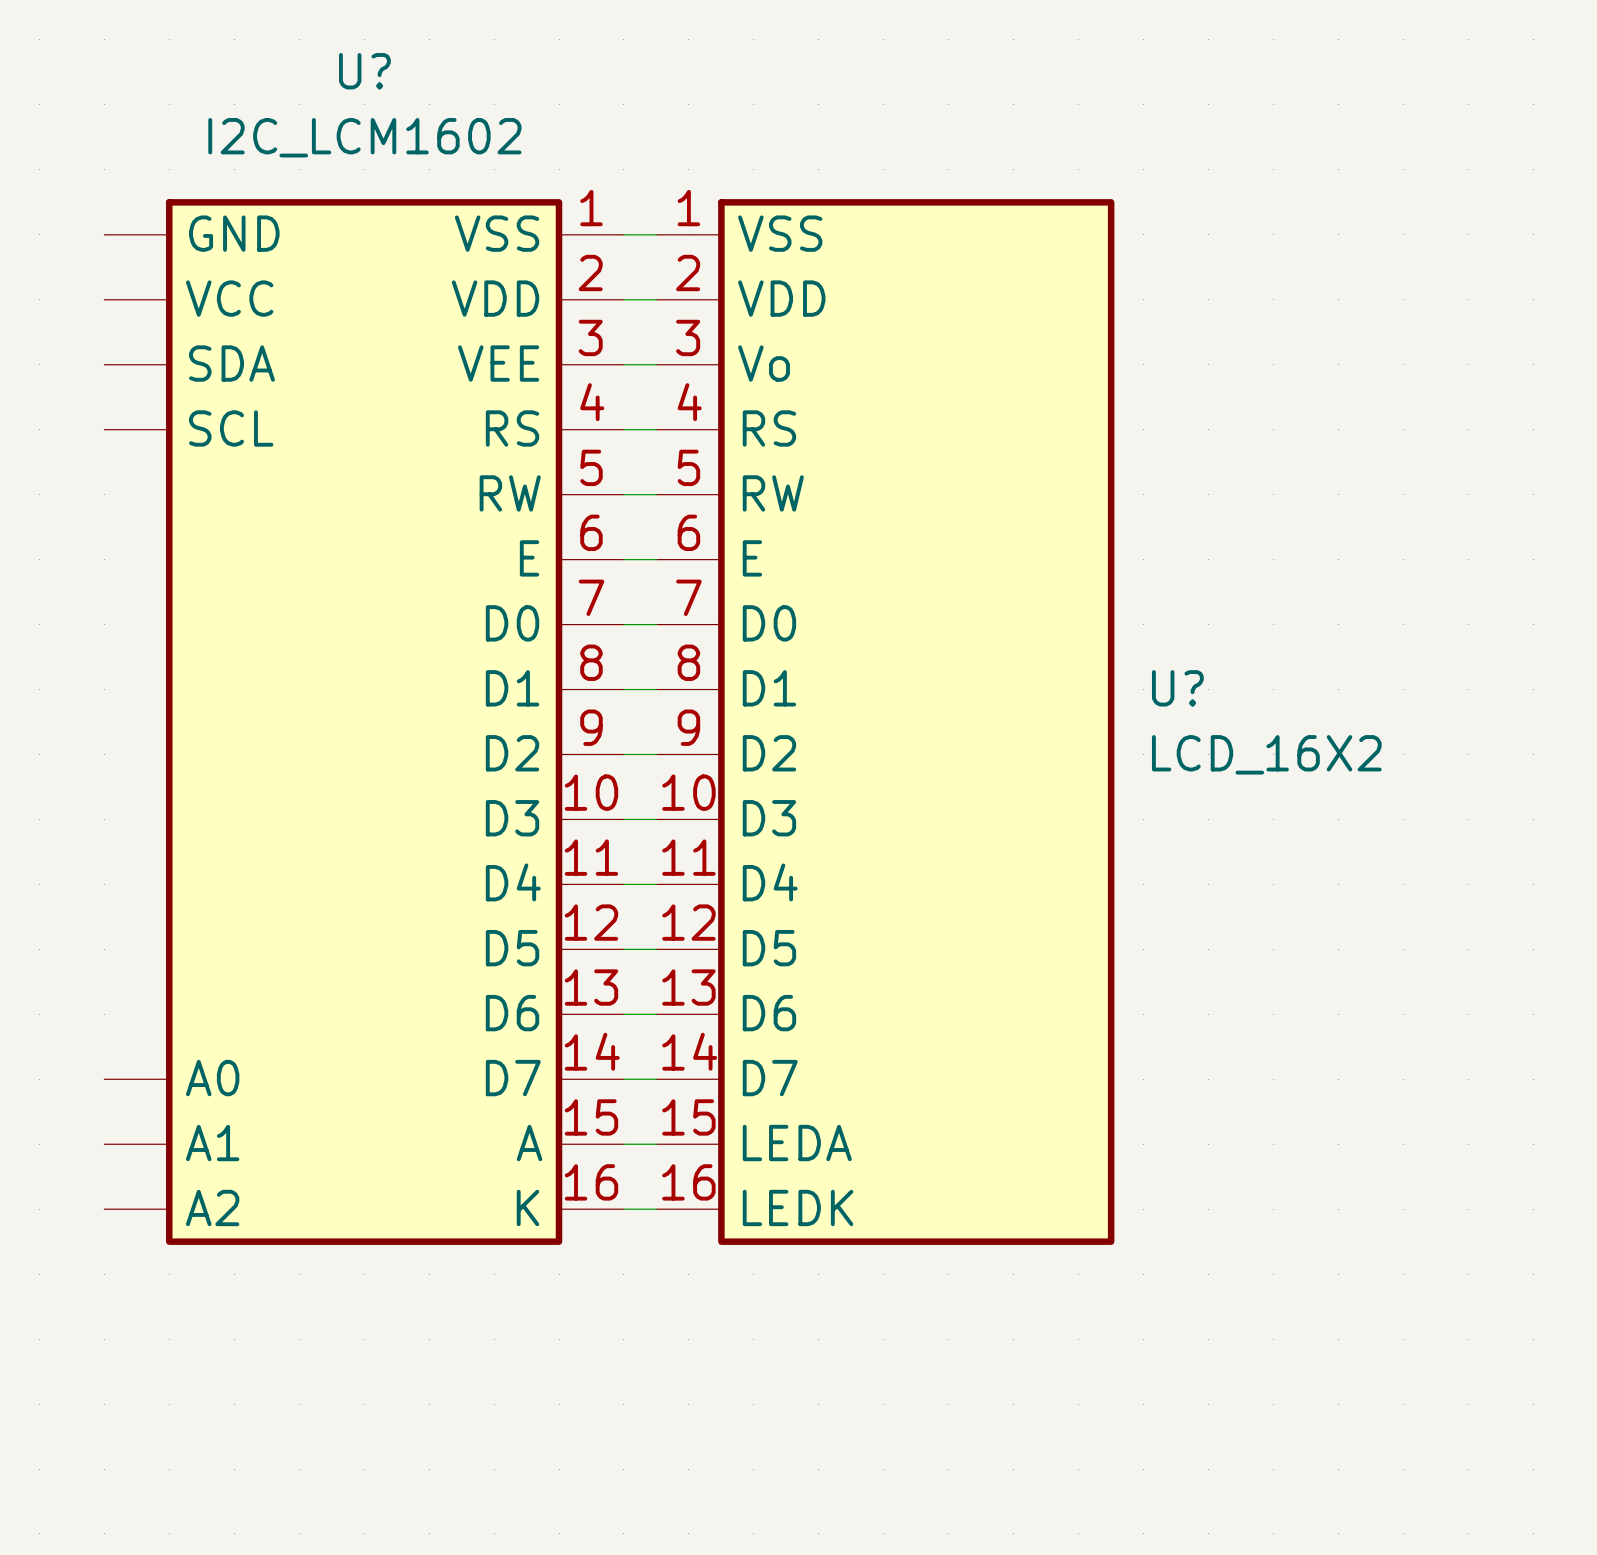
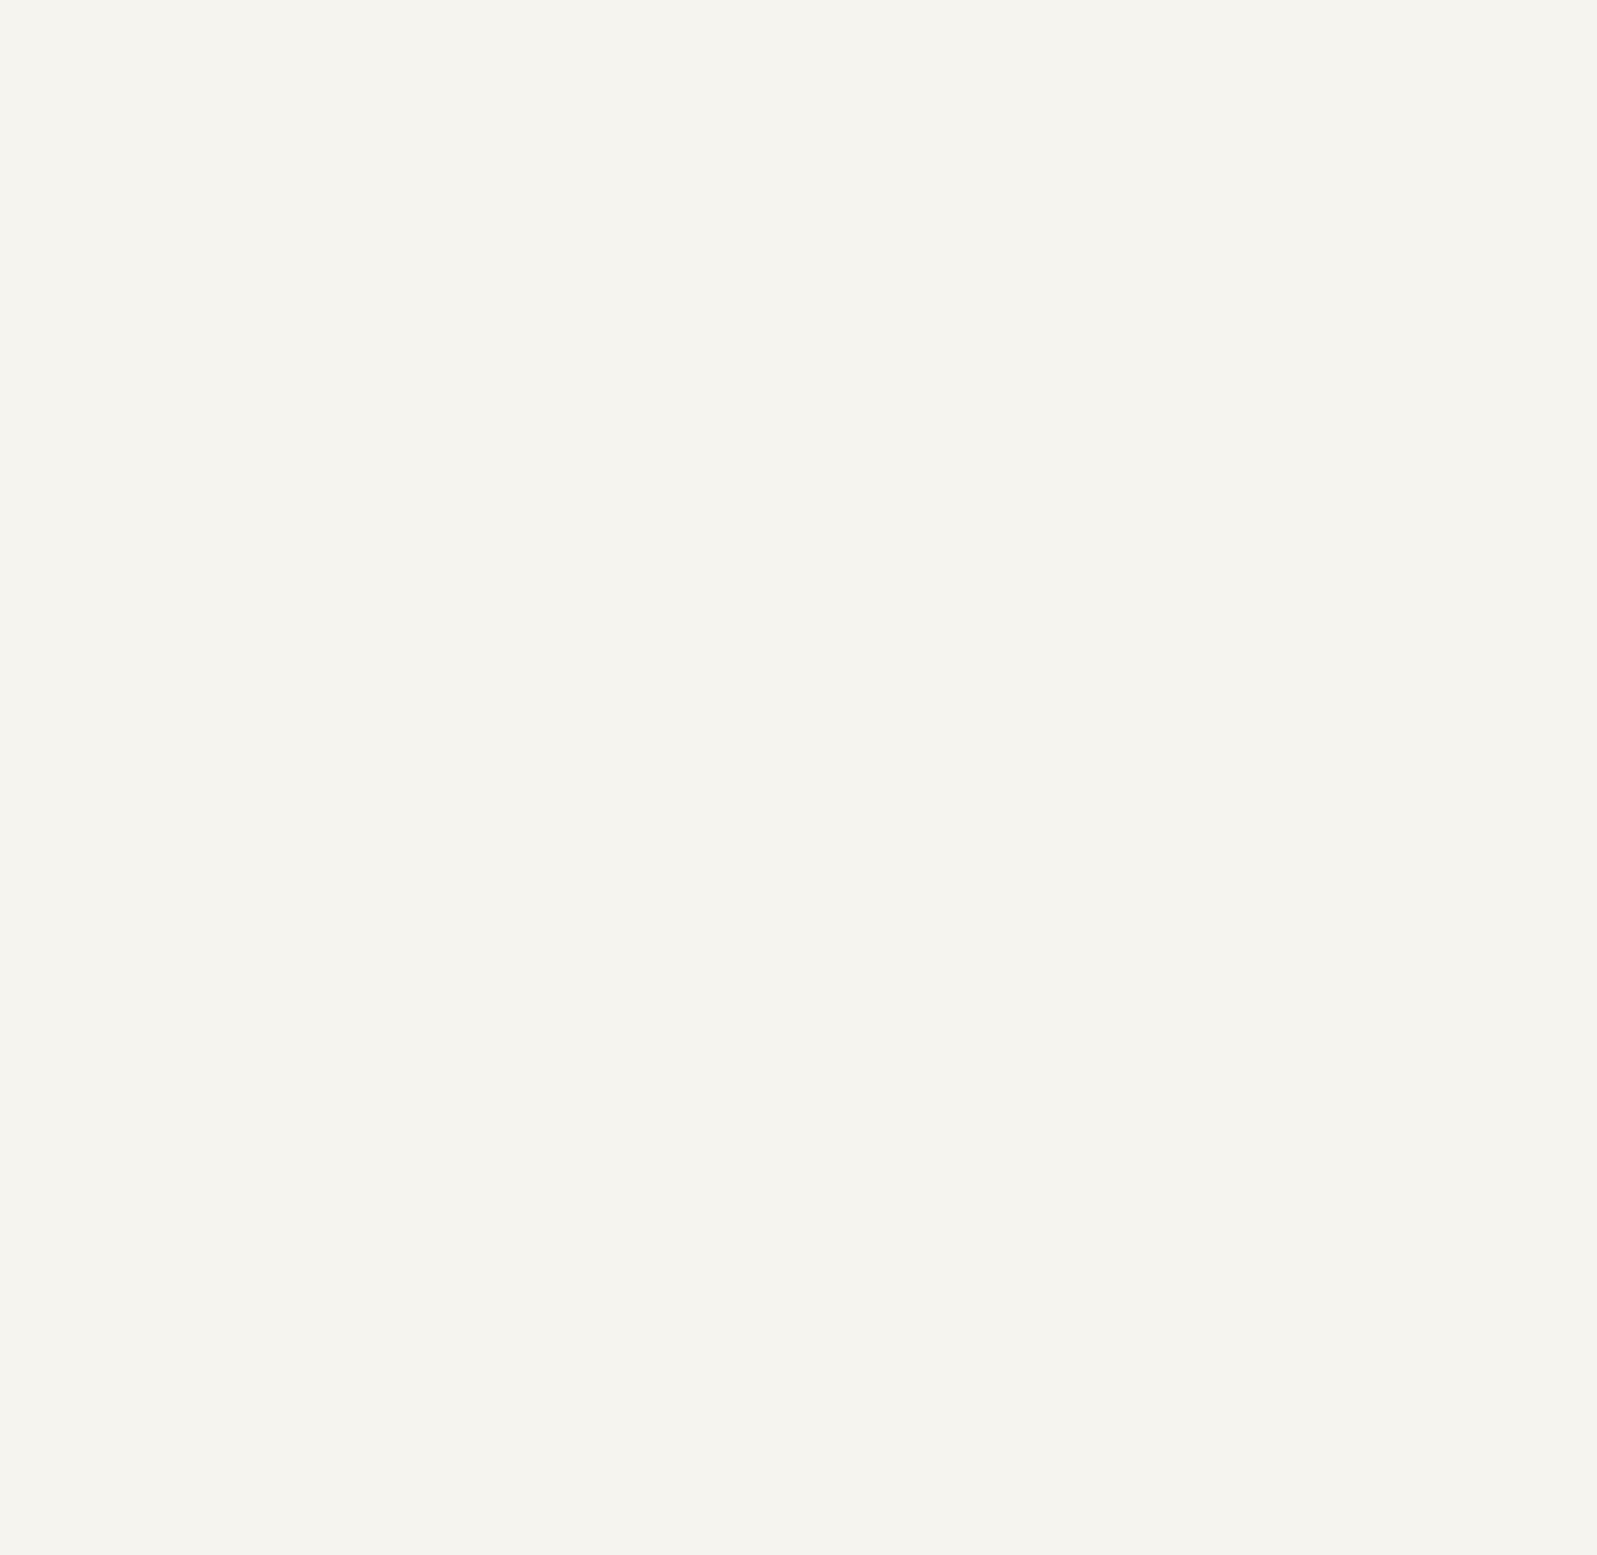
wire: (623, 234) (656, 234) -> none
wire: (623, 299) (656, 299) -> none
wire: (623, 364) (656, 364) -> none
wire: (623, 429) (656, 429) -> none
wire: (623, 494) (656, 494) -> none
wire: (623, 559) (656, 559) -> none
wire: (623, 624) (656, 624) -> none
wire: (623, 689) (656, 689) -> none
U?: I2C_LCM1602 (364, 722) -> none
U?: LCD_16X2 (885, 722) -> none
wire: (623, 754) (656, 754) -> none
wire: (623, 819) (656, 819) -> none
wire: (623, 884) (656, 884) -> none
wire: (623, 949) (656, 949) -> none
wire: (623, 1014) (656, 1014) -> none
wire: (623, 1079) (656, 1079) -> none
wire: (623, 1144) (656, 1144) -> none
wire: (623, 1209) (656, 1209) -> none

